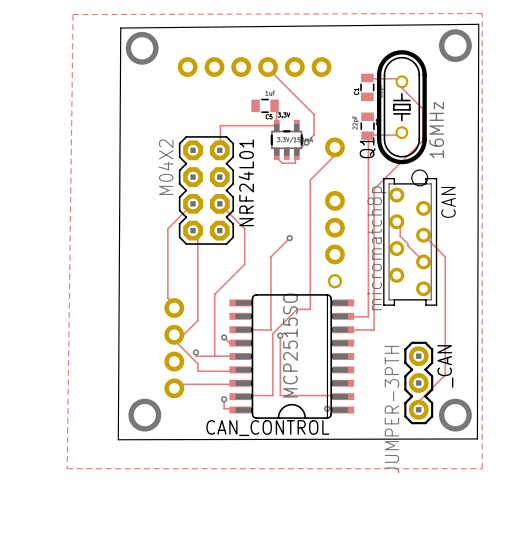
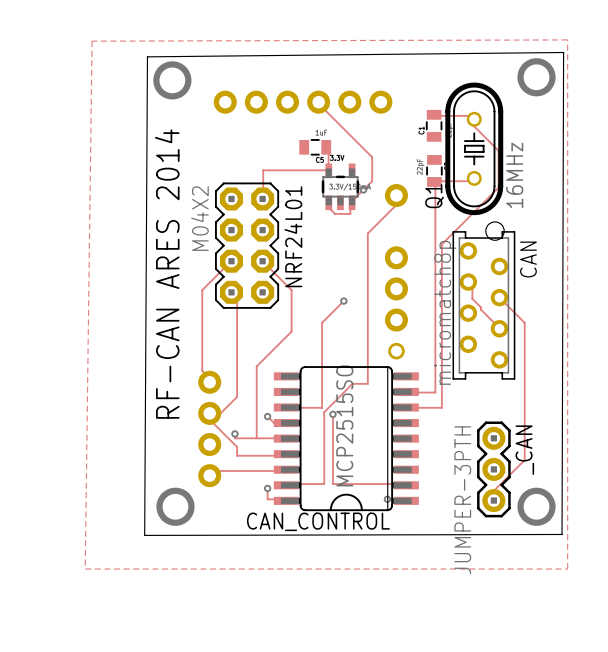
text: none -> RF-CAN ARES 2014 (167, 274)

